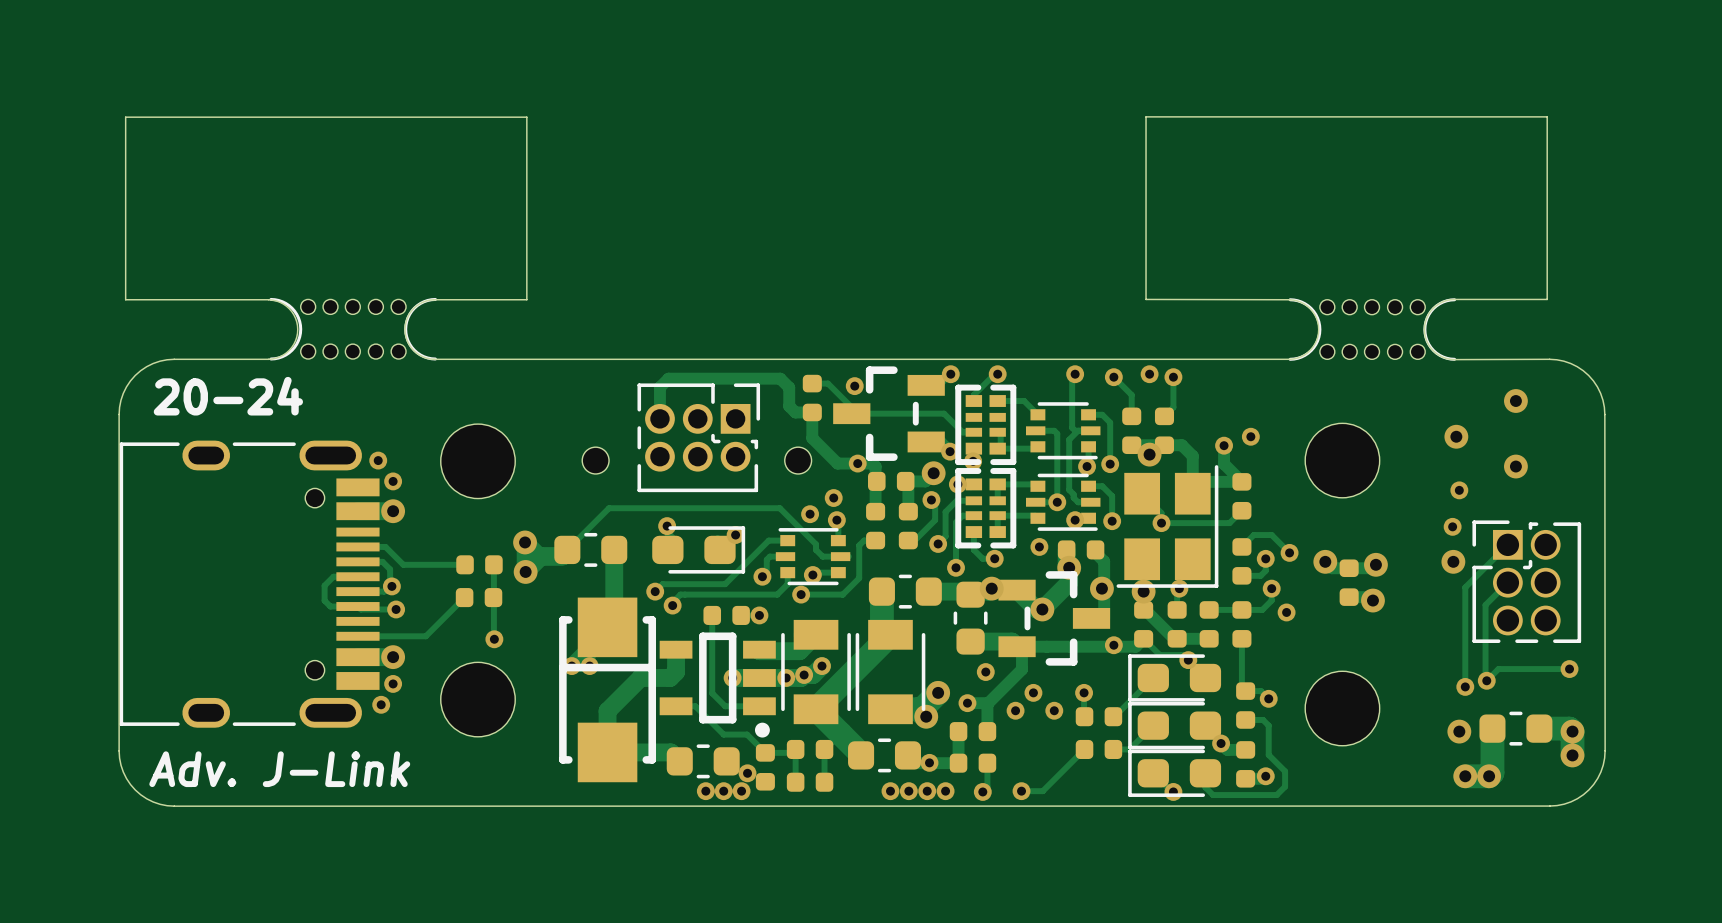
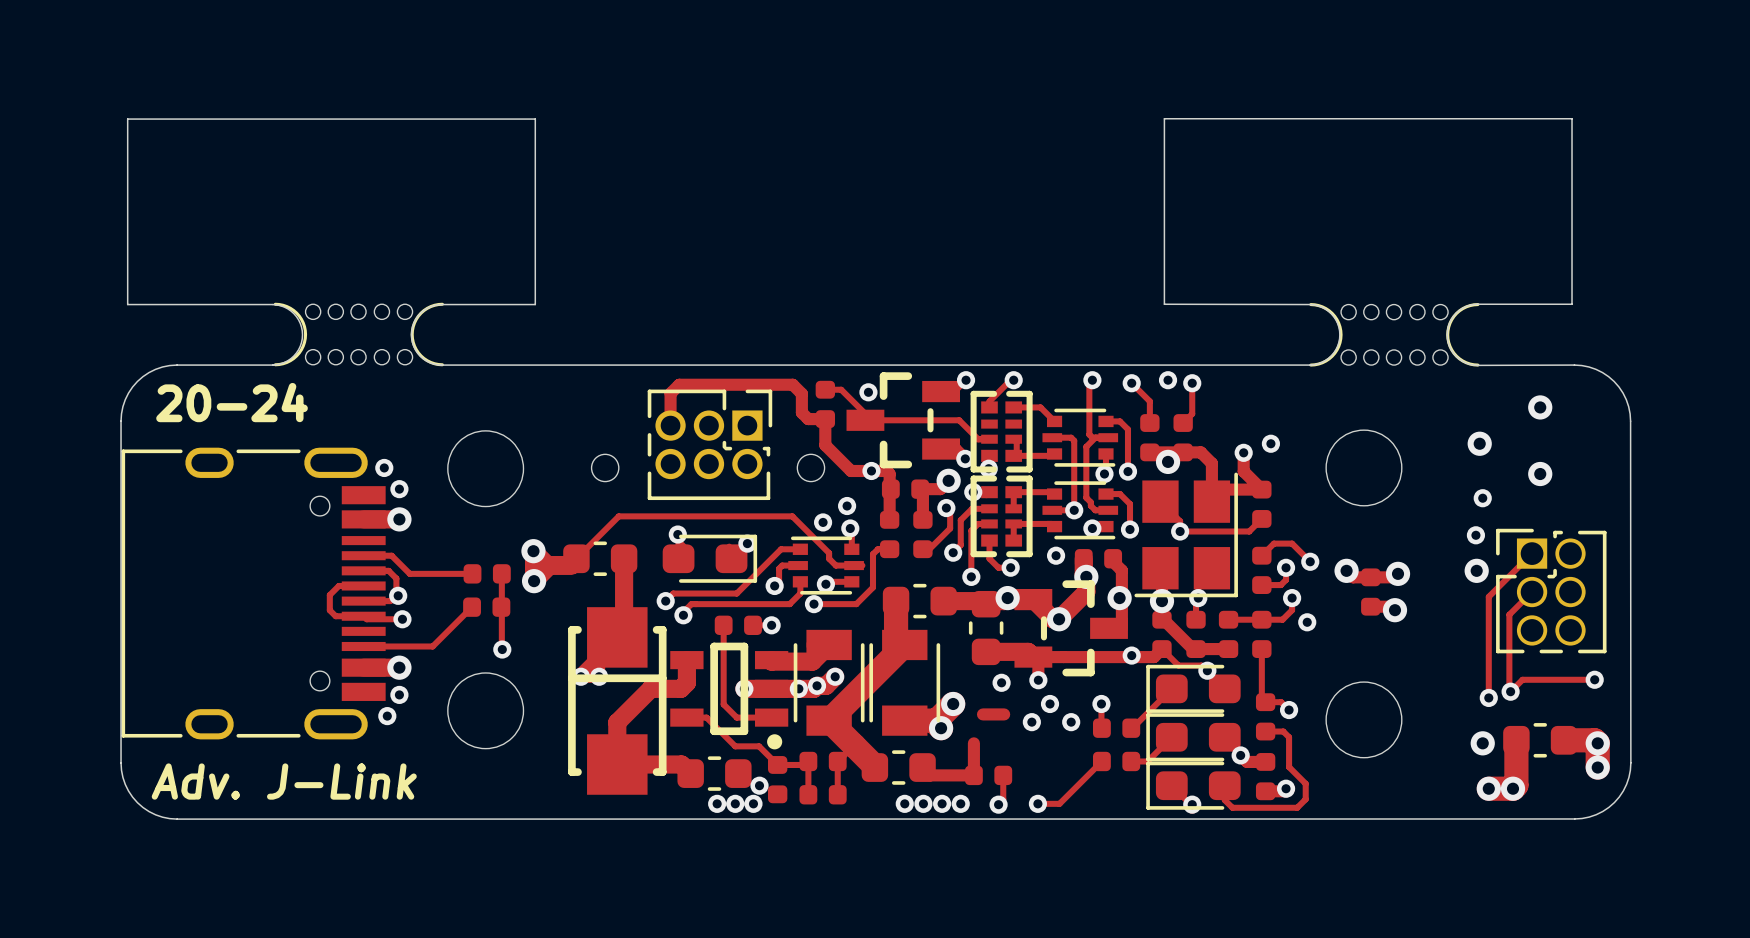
track: (1021, 669) (987, 704) (987, 731) -> none
via position: (967, 703) -> (1038, 680)
part: (972, 731) -> none
via: (929, 762) -> none

